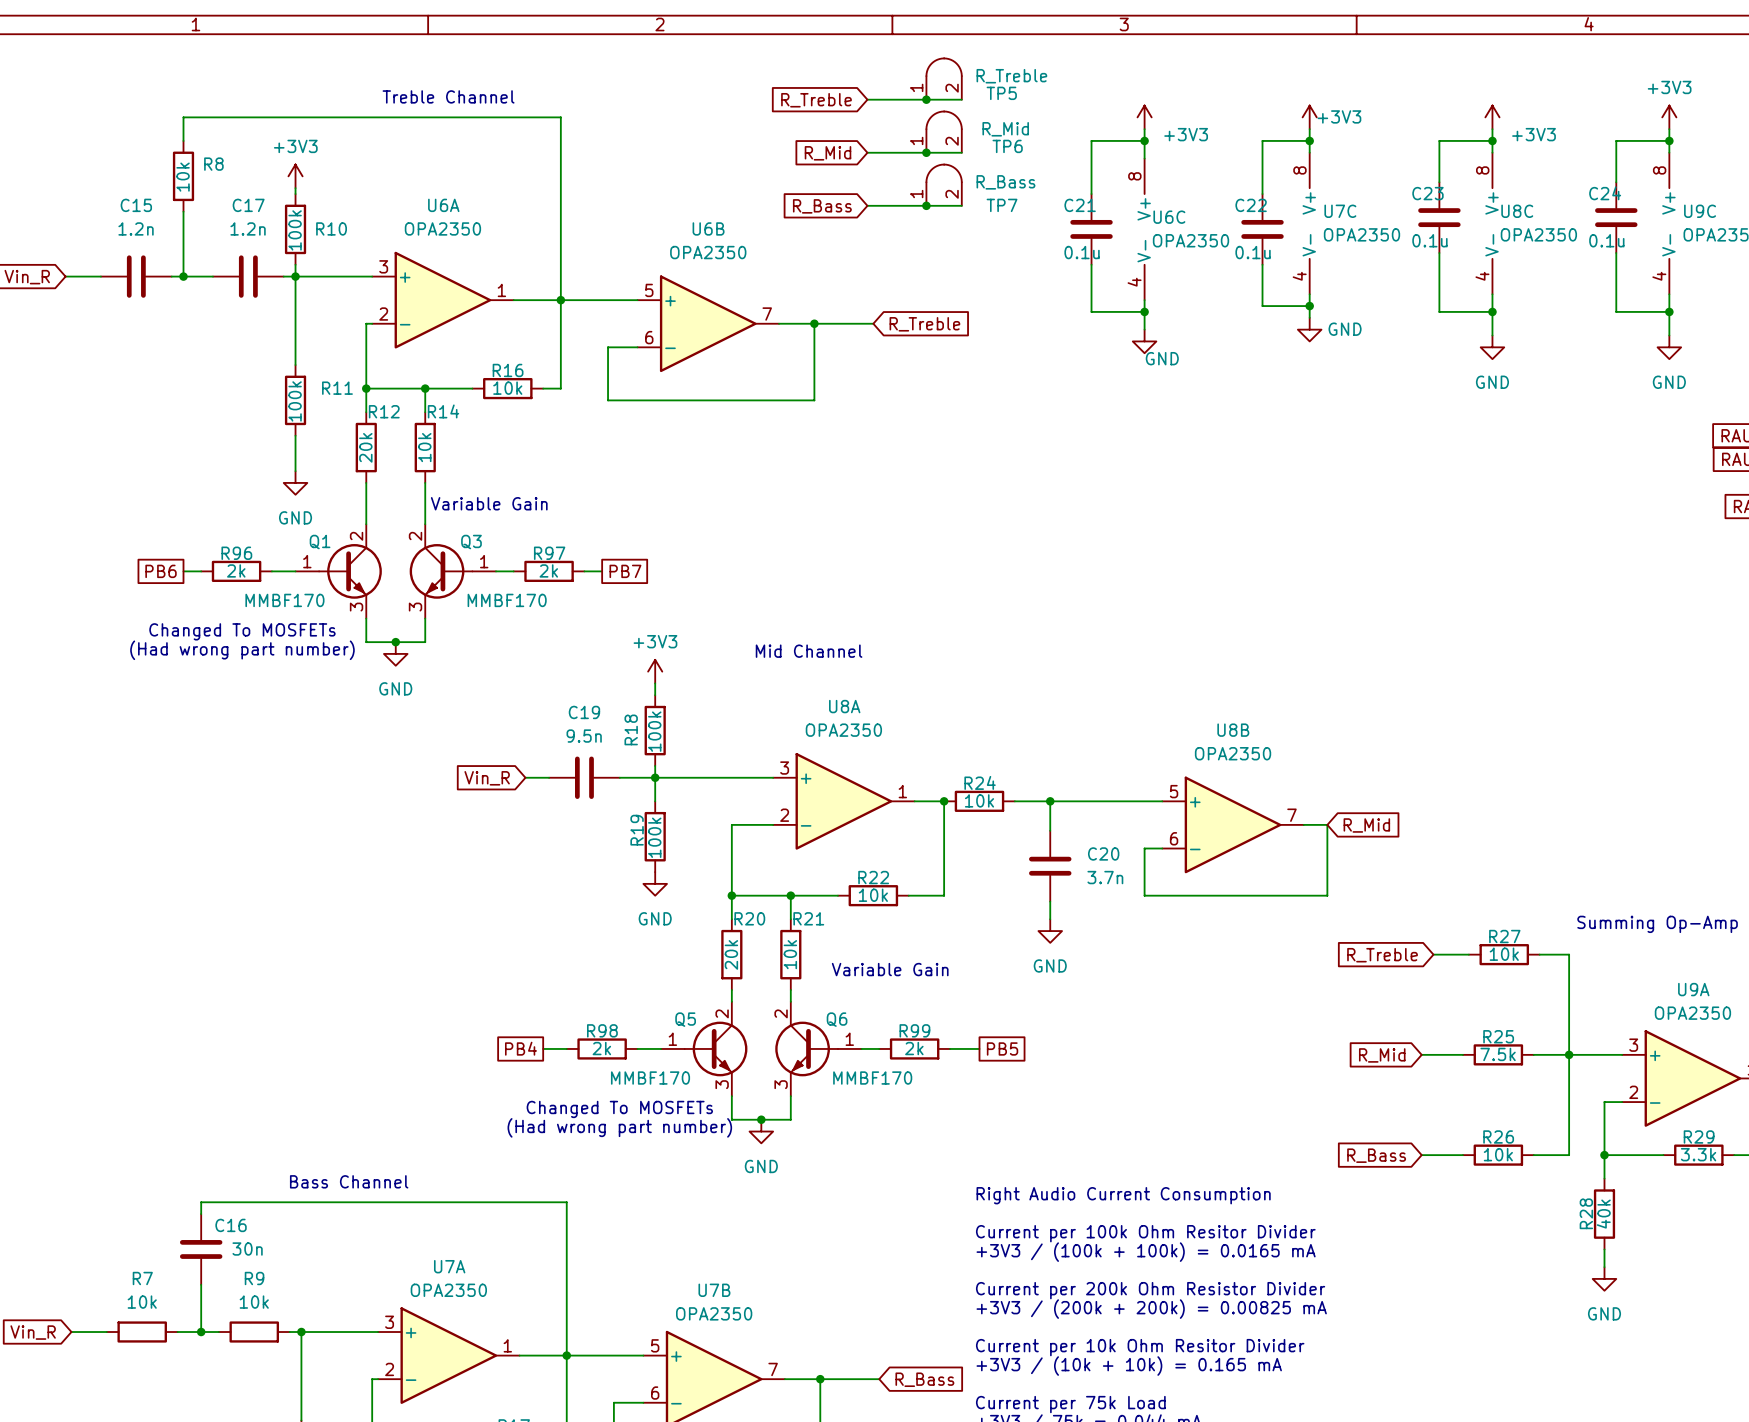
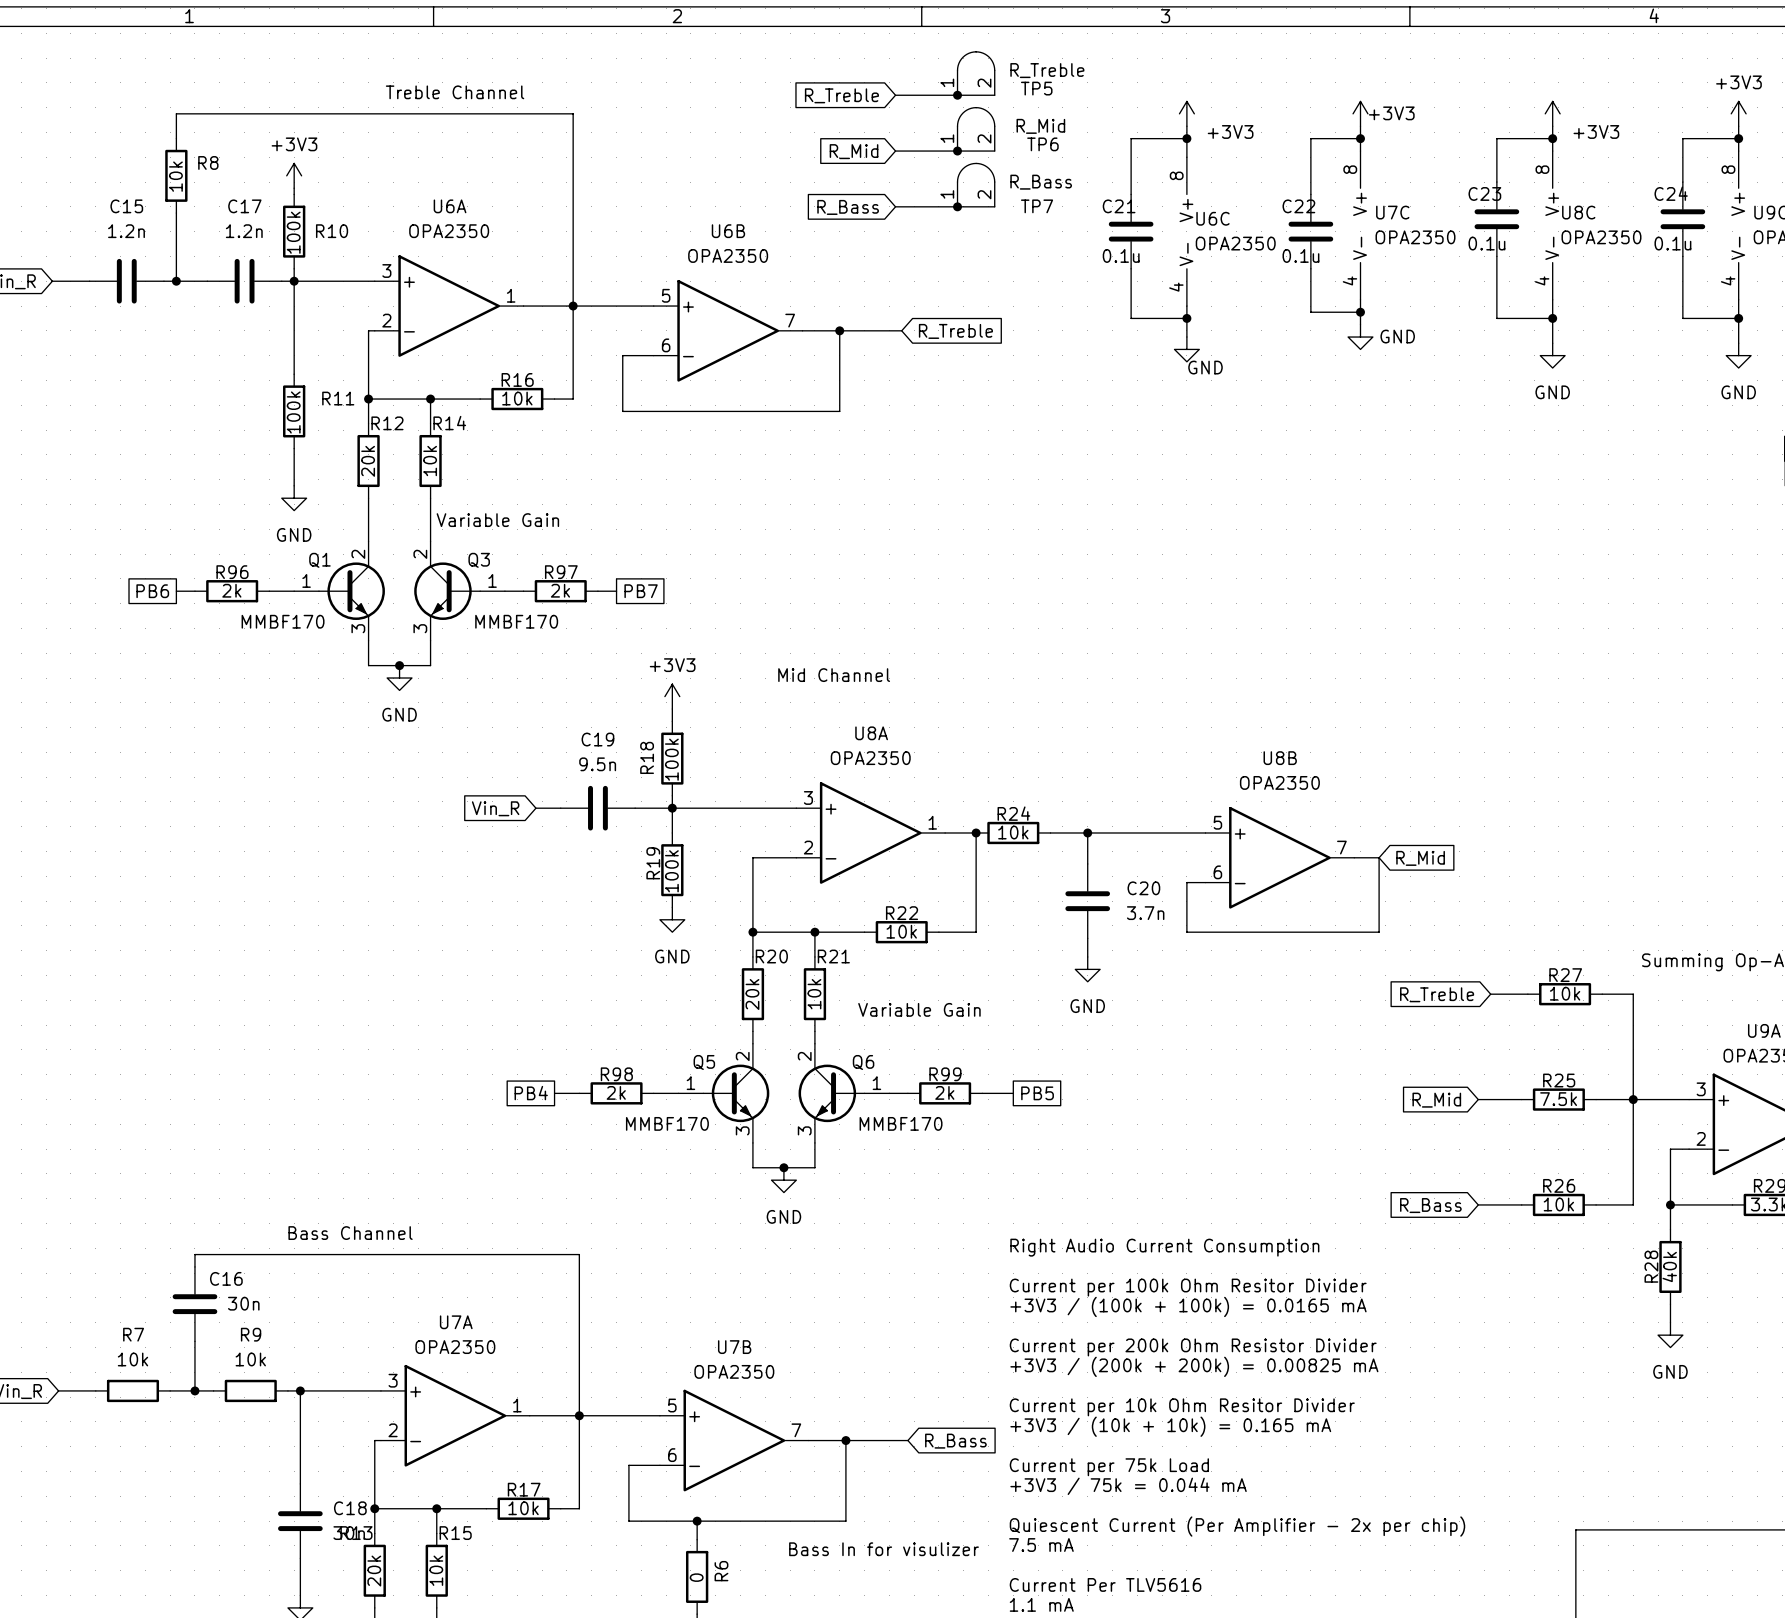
text: Changed To MOSFETs (242, 631) -> none
text: (Had wrong part number) (242, 650) -> none
text: Changed To MOSFETs (619, 1109) -> none
text: (Had wrong part number) (619, 1127) -> none

